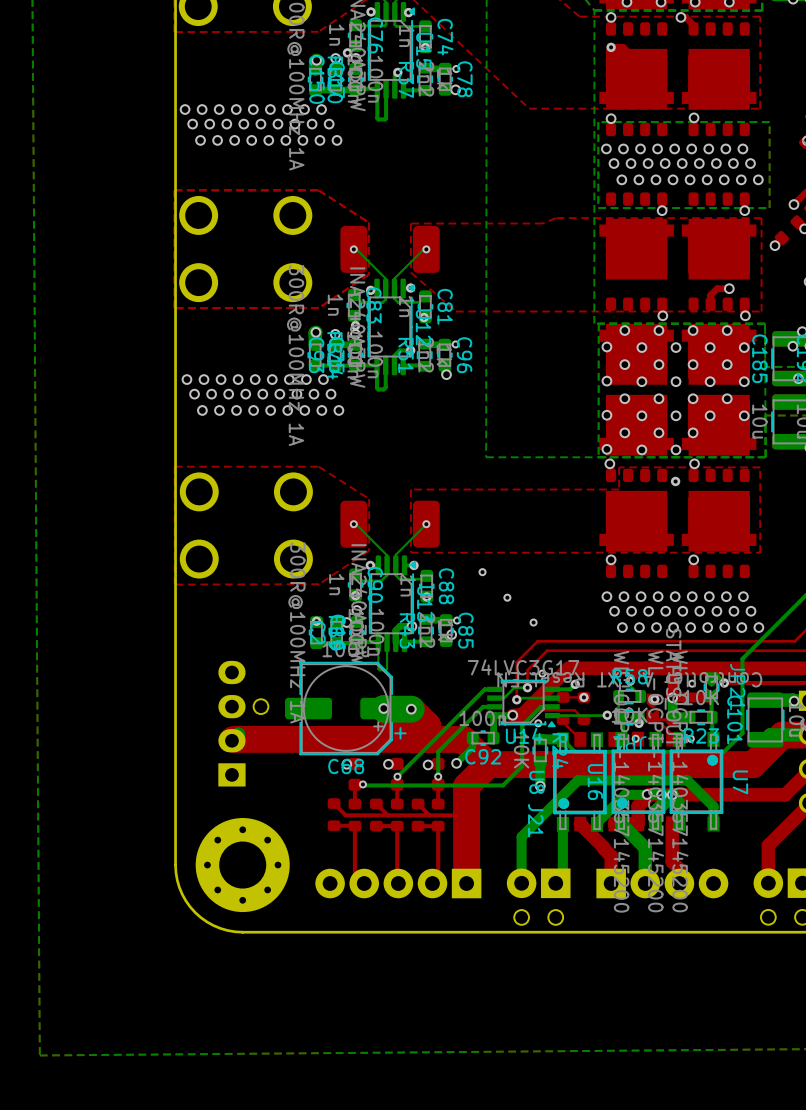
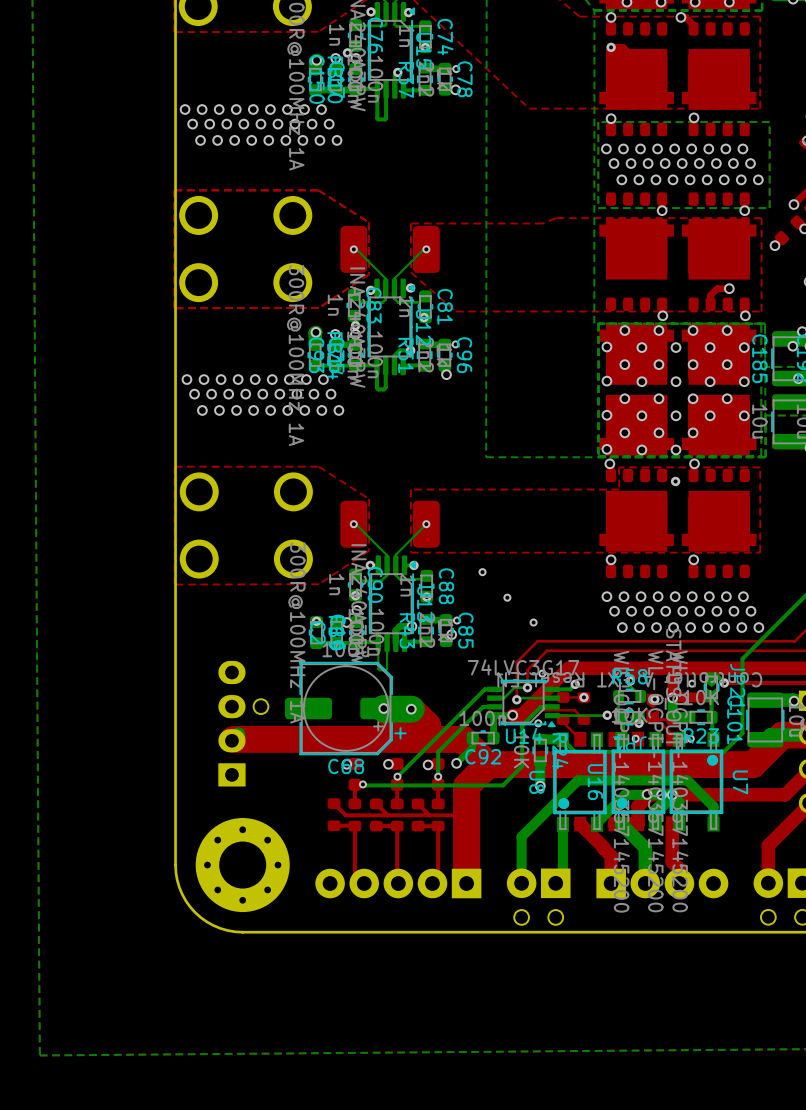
bottom zone outline: none -> (761, 323) (598, 323) (598, 455) (761, 455) (761, 323)
J21 name: J21 (535, 820) -> none

